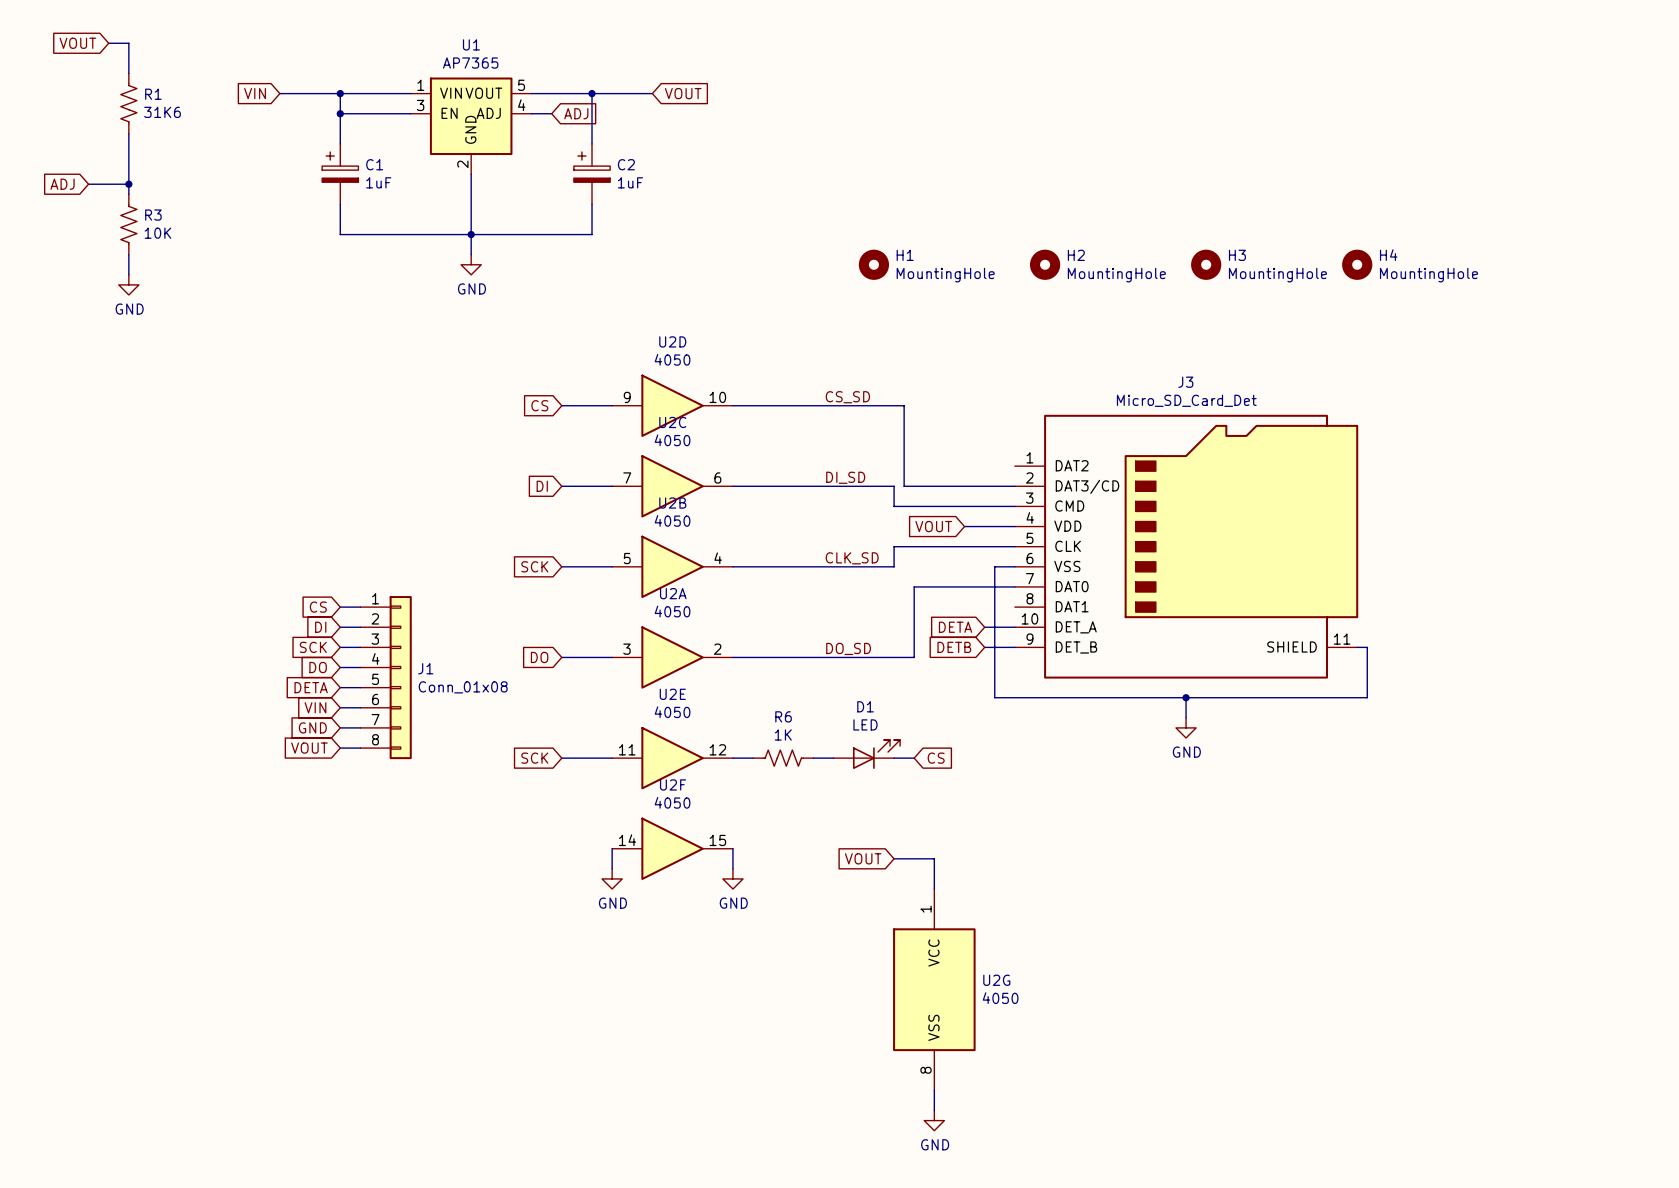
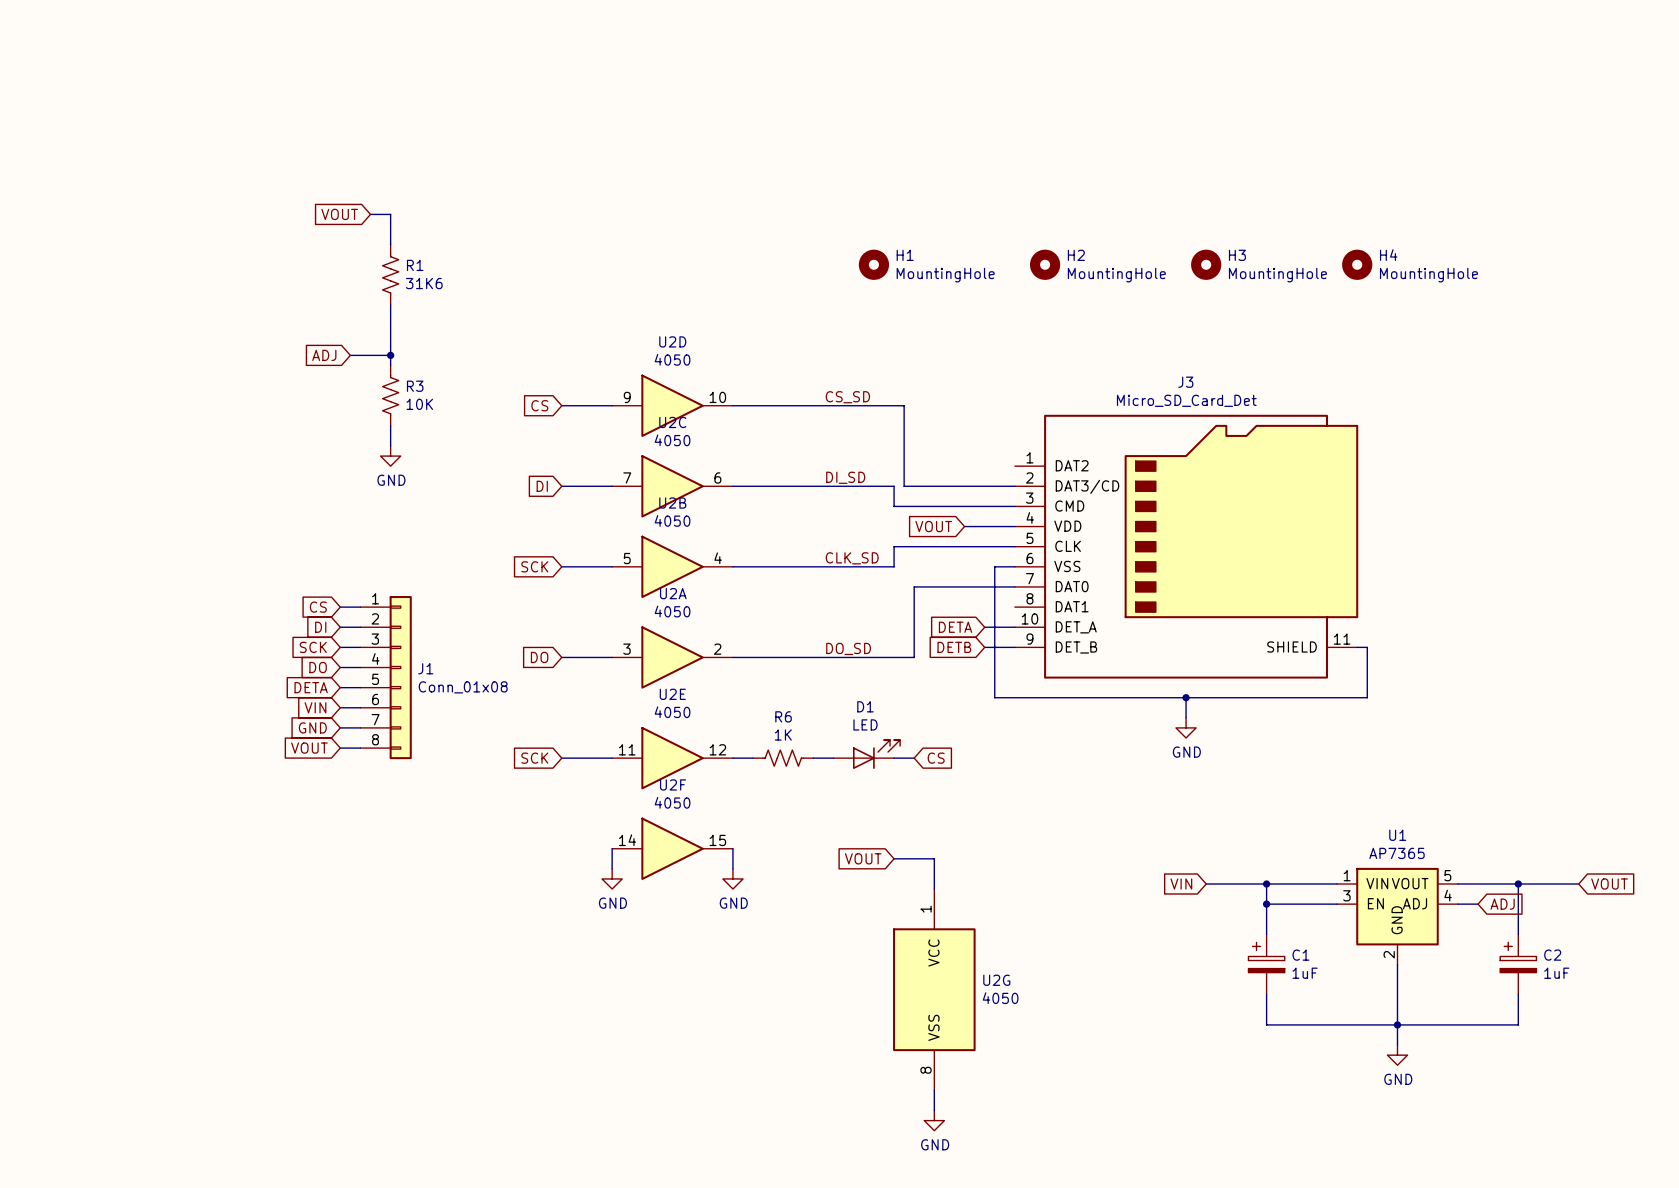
global label: VOUT (77, 43) -> none
wire: (108, 43) (128, 43) (128, 73) -> none
global label: VIN (255, 93) -> none
wire: (279, 93) (410, 93) -> none
wire: (340, 93) (340, 143) -> none
junction: (340, 93) -> none
wire: (531, 93) (652, 93) -> none
wire: (592, 93) (592, 143) -> none
junction: (592, 93) -> none
global label: VOUT (683, 93) -> none
R1 position: (128, 103) -> (390, 274)
wire: (340, 113) (410, 113) -> none
junction: (340, 113) -> none
wire: (531, 113) (551, 113) -> none
global label: ADJ (576, 113) -> none
U1 position: (471, 125) -> (1397, 916)
wire: (128, 133) (128, 194) -> none
C1 position: (340, 174) -> (1266, 964)
wire: (471, 174) (471, 254) -> none
C2 position: (592, 174) -> (1518, 964)
global label: ADJ (62, 184) -> none
wire: (88, 184) (128, 184) -> none
junction: (128, 184) -> none
wire: (340, 204) (340, 234) (592, 234) (592, 204) -> none
global label: none -> VOUT (339, 214)
wire: none -> (370, 214) (390, 214) (390, 244)
R3 position: (128, 224) -> (390, 395)
junction: (471, 234) -> none
wire: (128, 254) (128, 274) -> none
power symbol: GND (471, 264) -> none
power symbol: GND (128, 284) -> none
wire: none -> (390, 305) (390, 365)
global label: none -> ADJ (324, 355)
wire: none -> (350, 355) (390, 355)
junction: none -> (390, 355)
wire: none -> (390, 425) (390, 446)
power symbol: none -> GND (390, 456)
global label: none -> VIN (1181, 883)
wire: none -> (1206, 883) (1337, 883)
wire: none -> (1266, 883) (1266, 934)
junction: none -> (1266, 883)
wire: none -> (1457, 883) (1578, 883)
wire: none -> (1518, 883) (1518, 934)
junction: none -> (1518, 883)
global label: none -> VOUT (1609, 883)
wire: none -> (1266, 904) (1337, 904)
junction: none -> (1266, 904)
wire: none -> (1457, 904) (1478, 904)
global label: none -> ADJ (1502, 904)
wire: none -> (1397, 964) (1397, 1045)
wire: none -> (1266, 994) (1266, 1024) (1518, 1024) (1518, 994)
junction: none -> (1397, 1024)
power symbol: none -> GND (1397, 1055)

